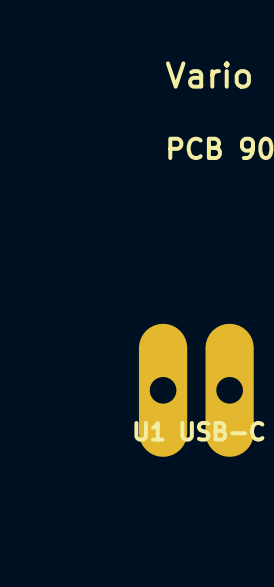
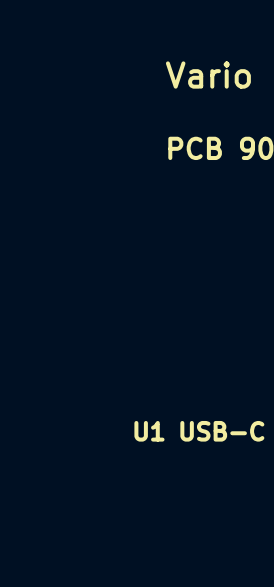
part: (196, 390) -> none

